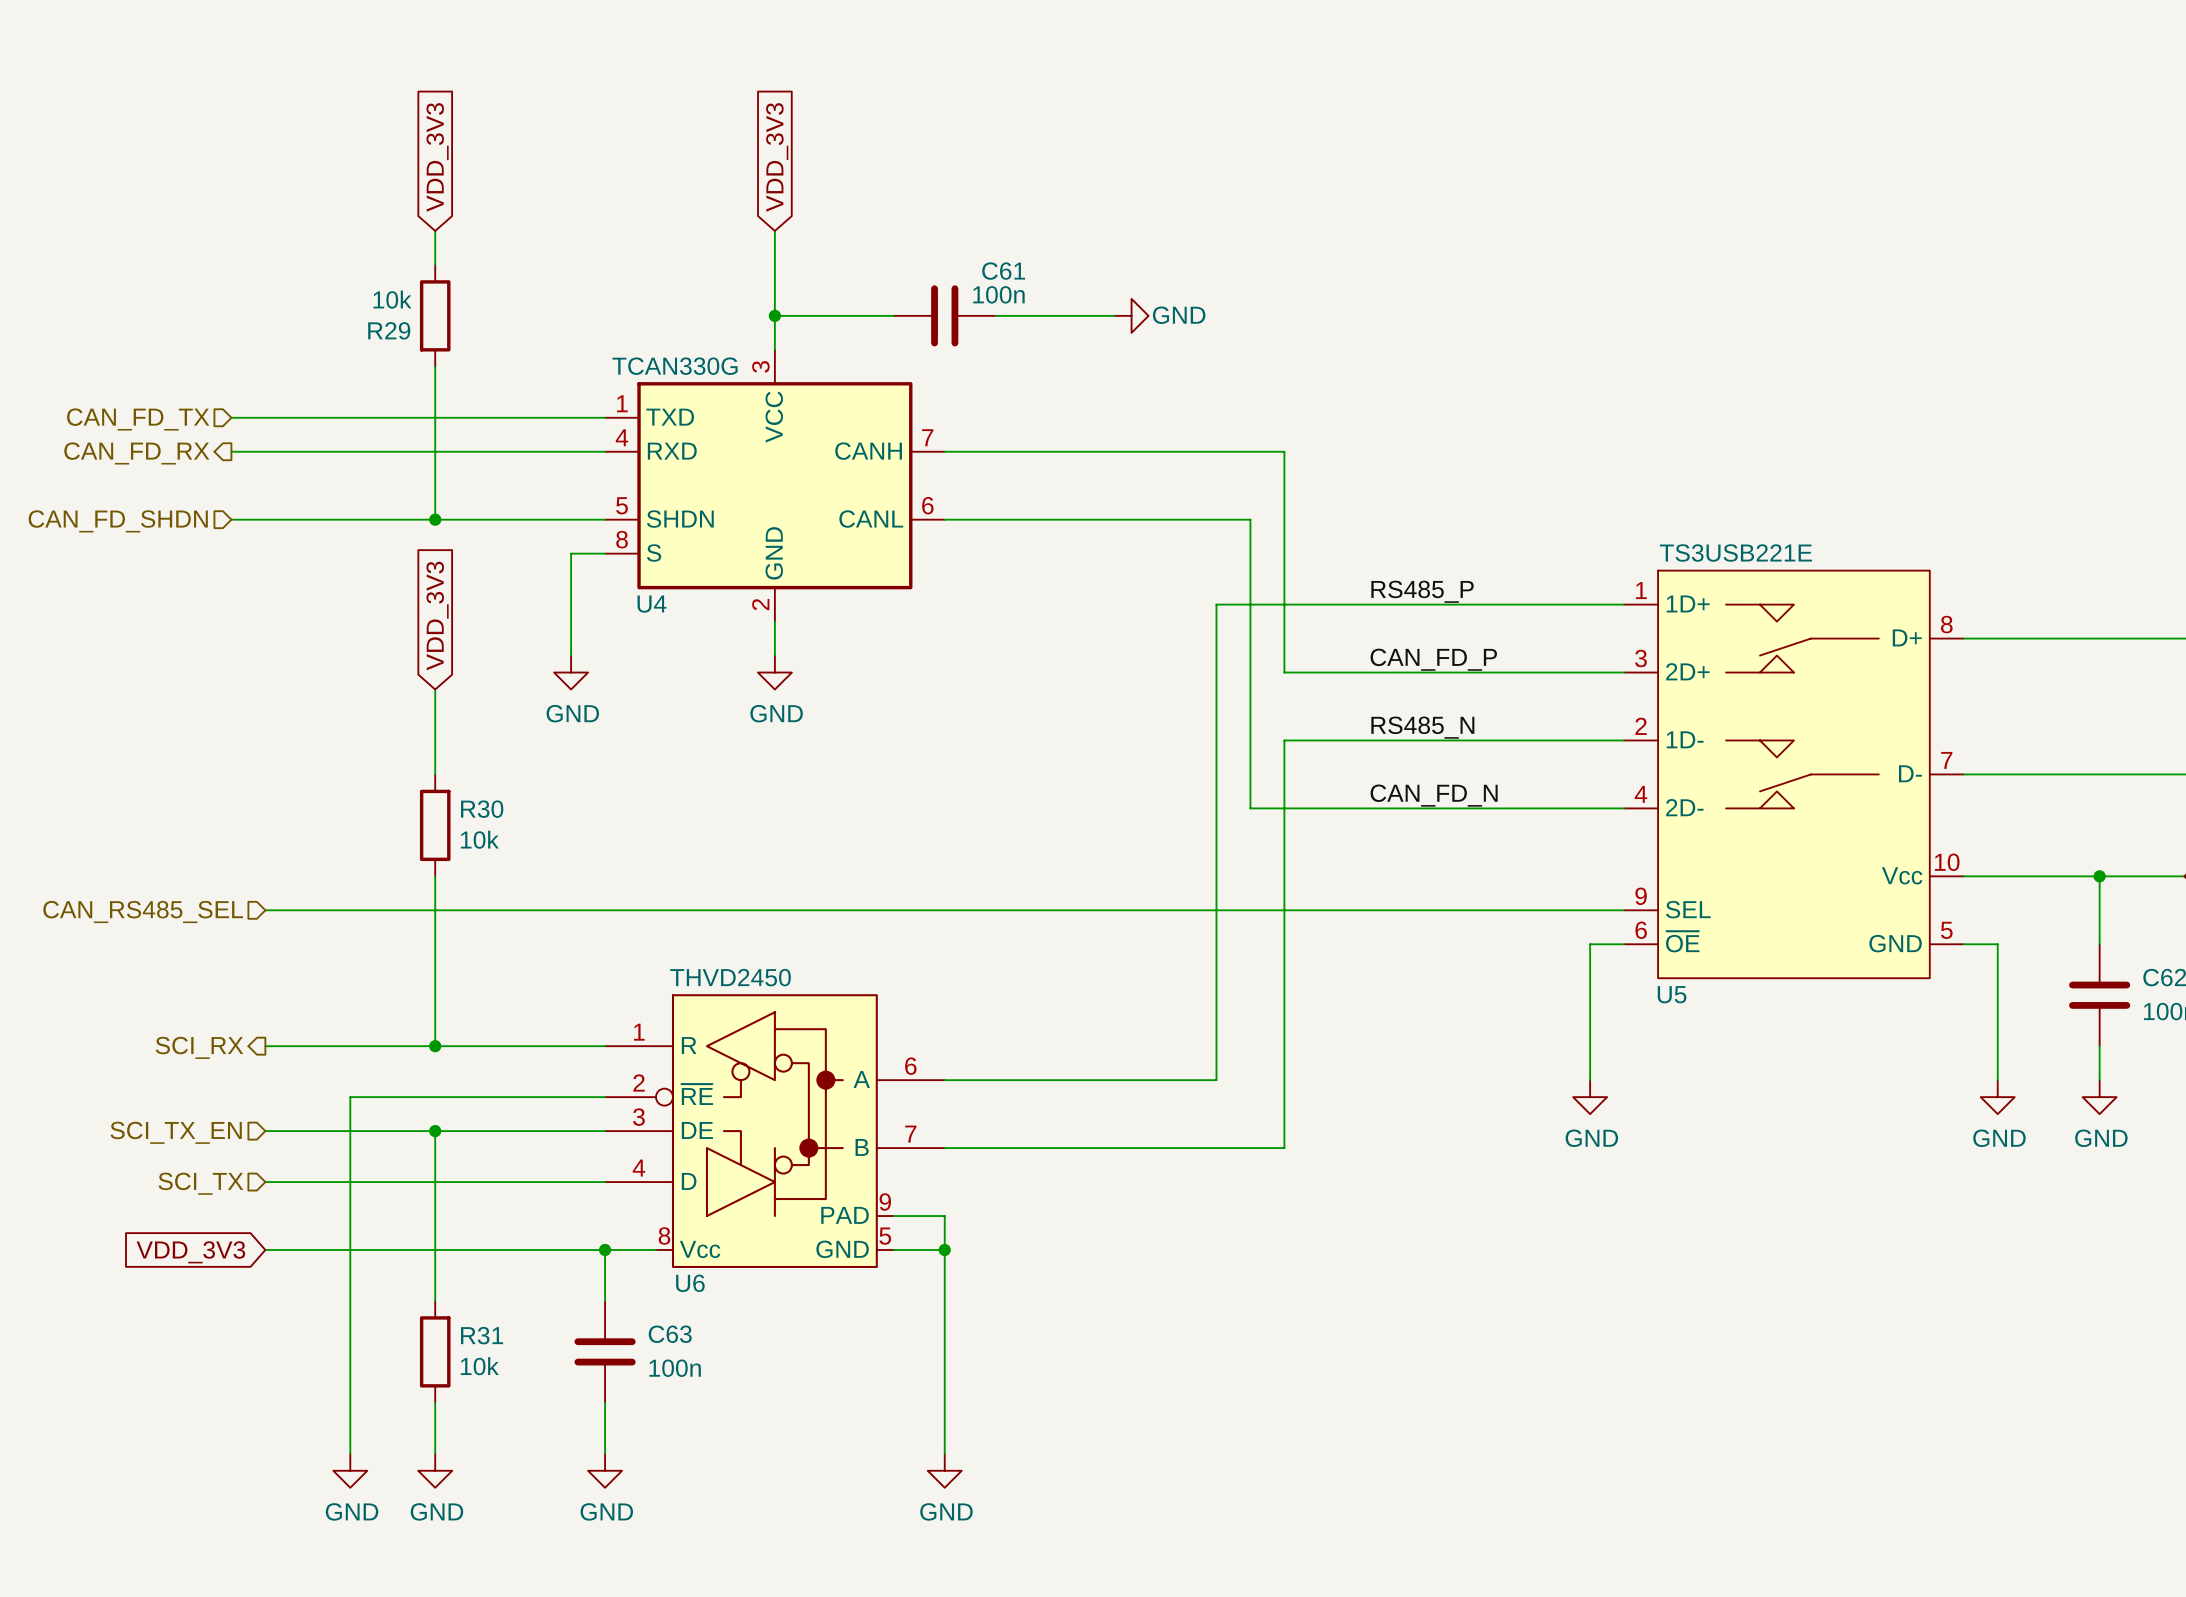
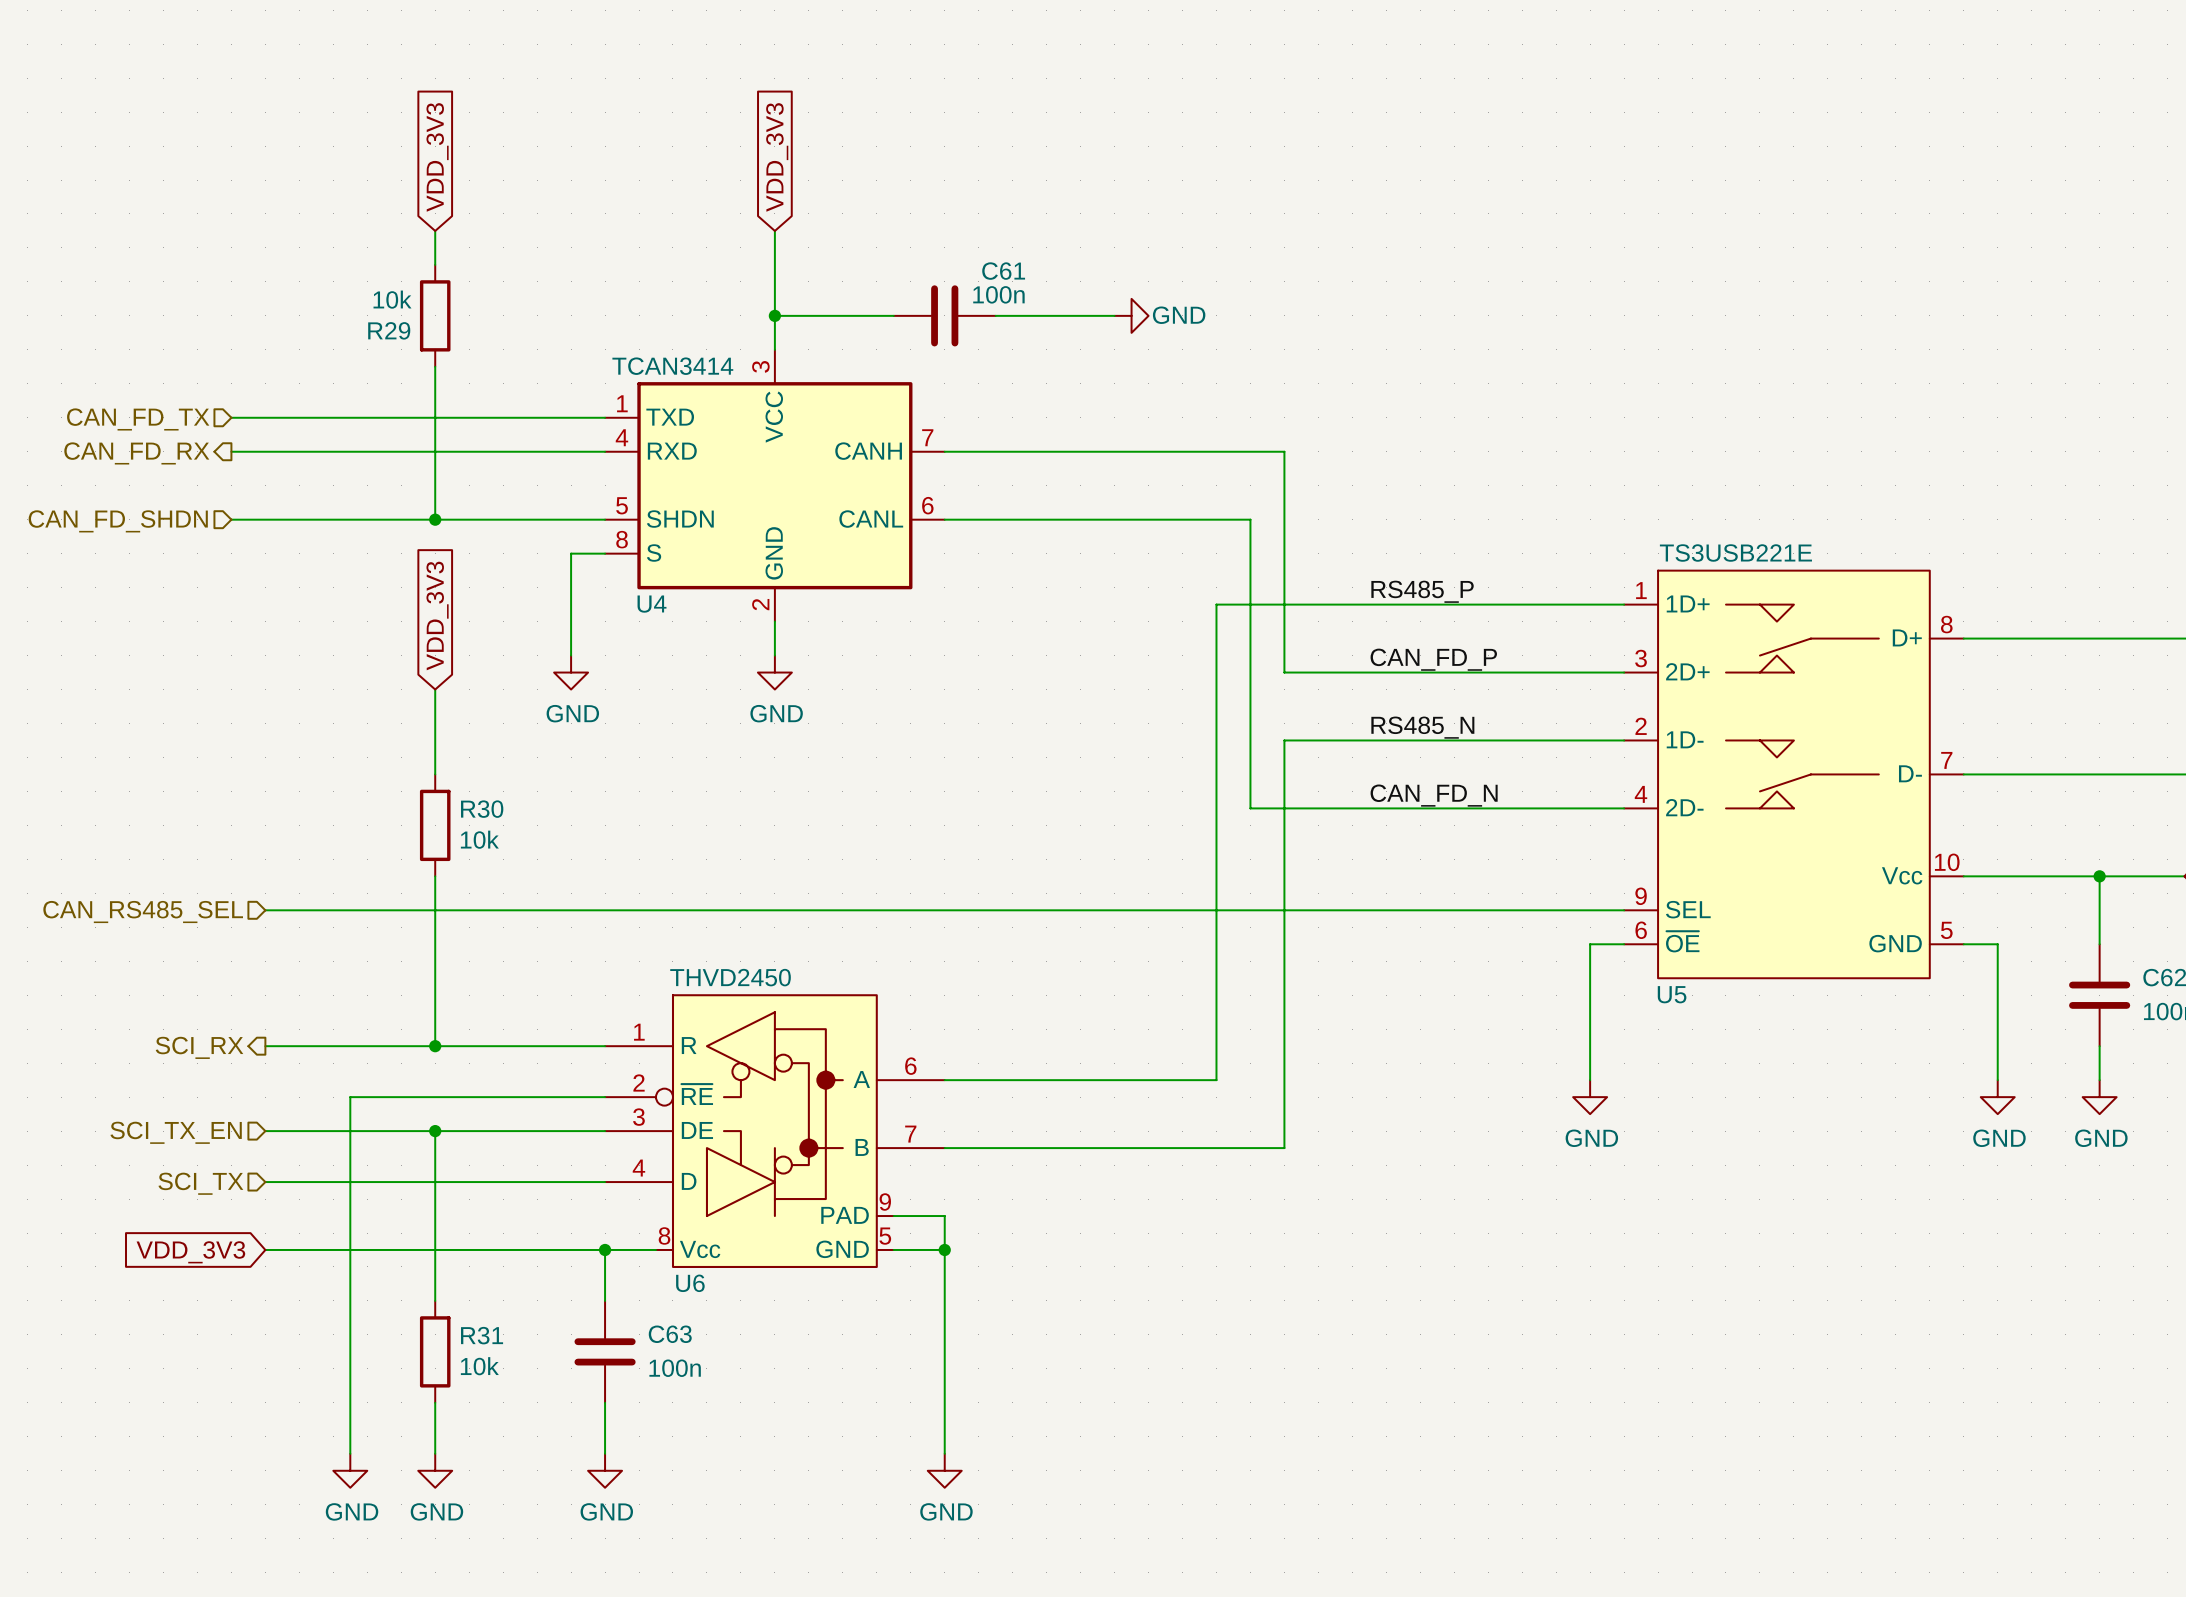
U4 value: TCAN330G (675, 366) -> TCAN3414 (672, 366)

